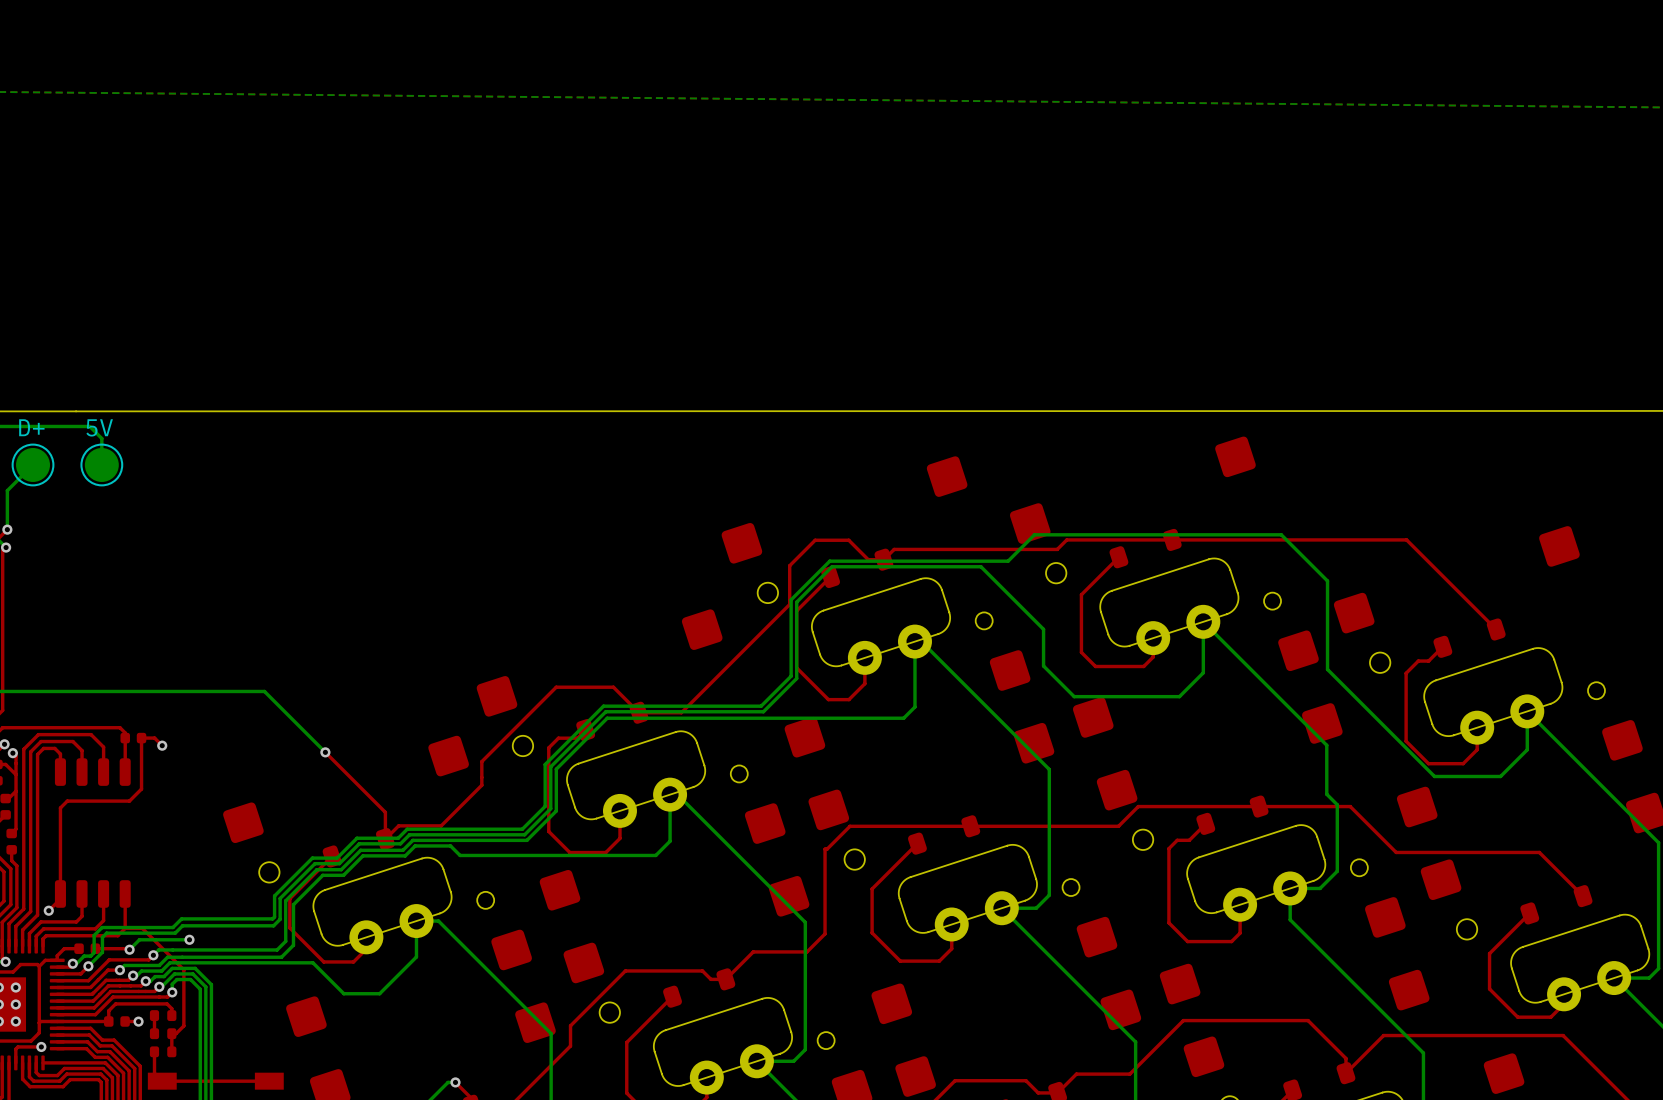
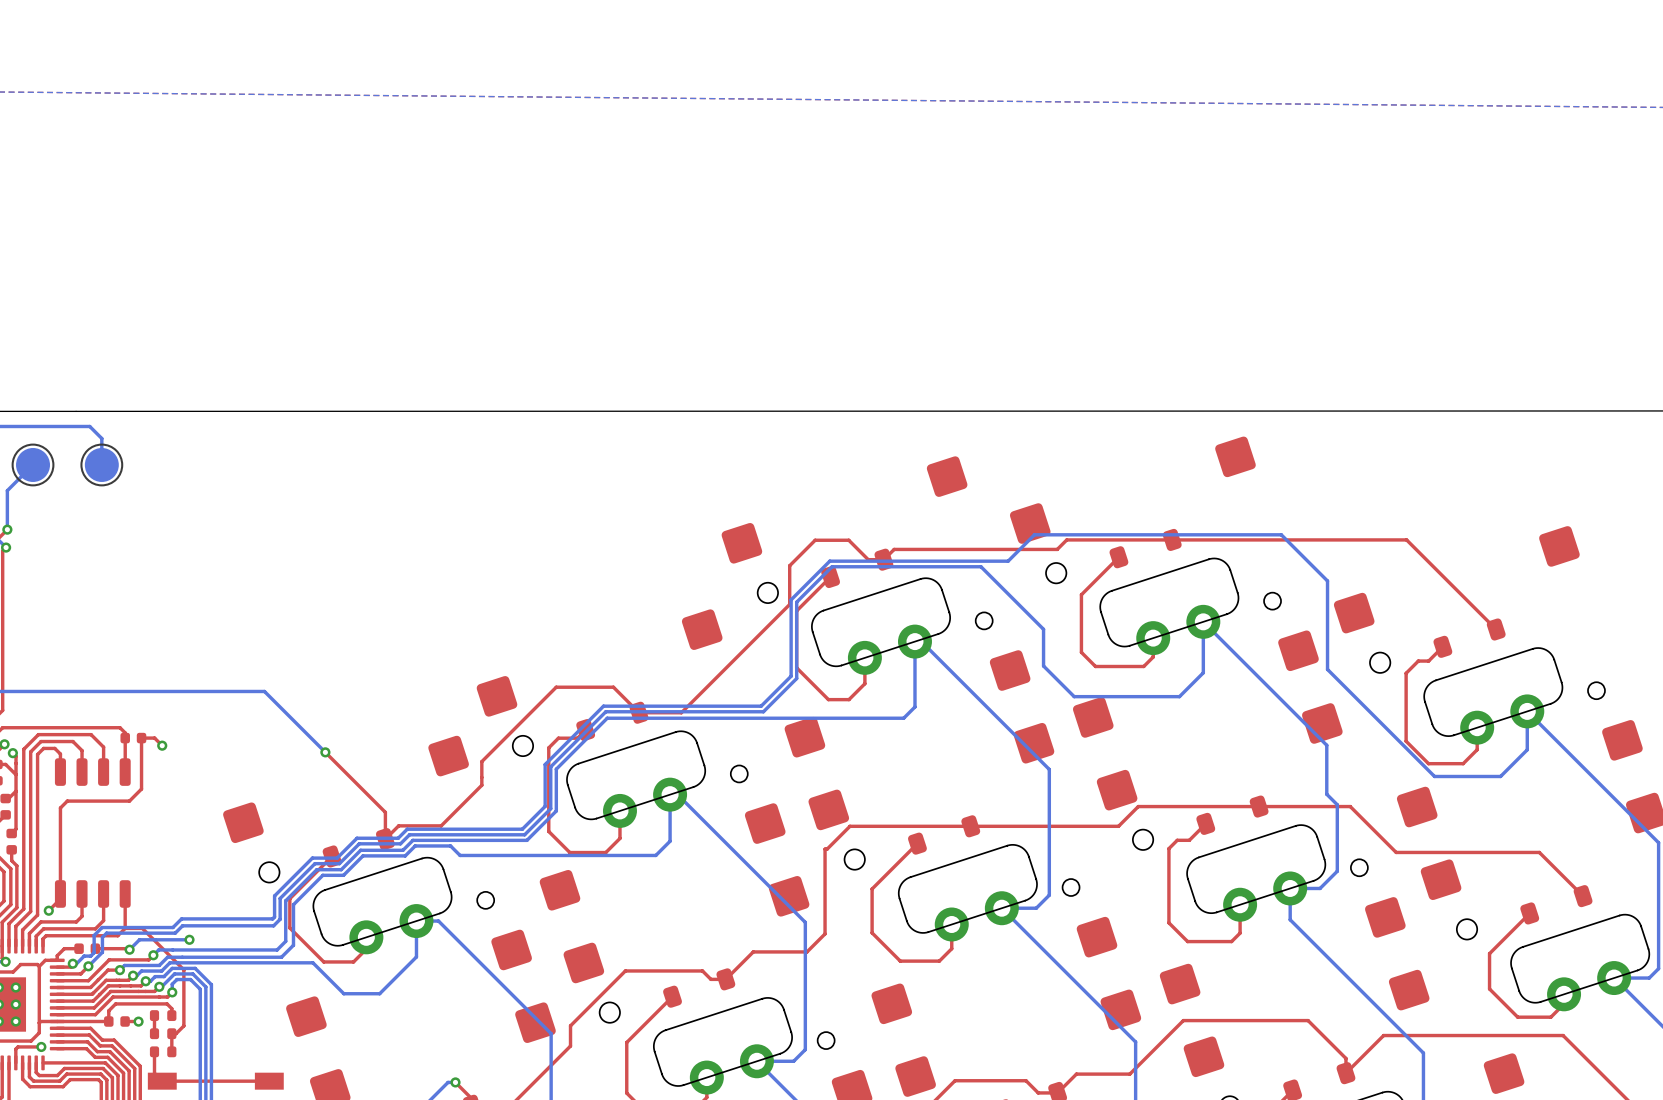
text: D+ (31, 427) -> none
text: 5V (99, 427) -> none

